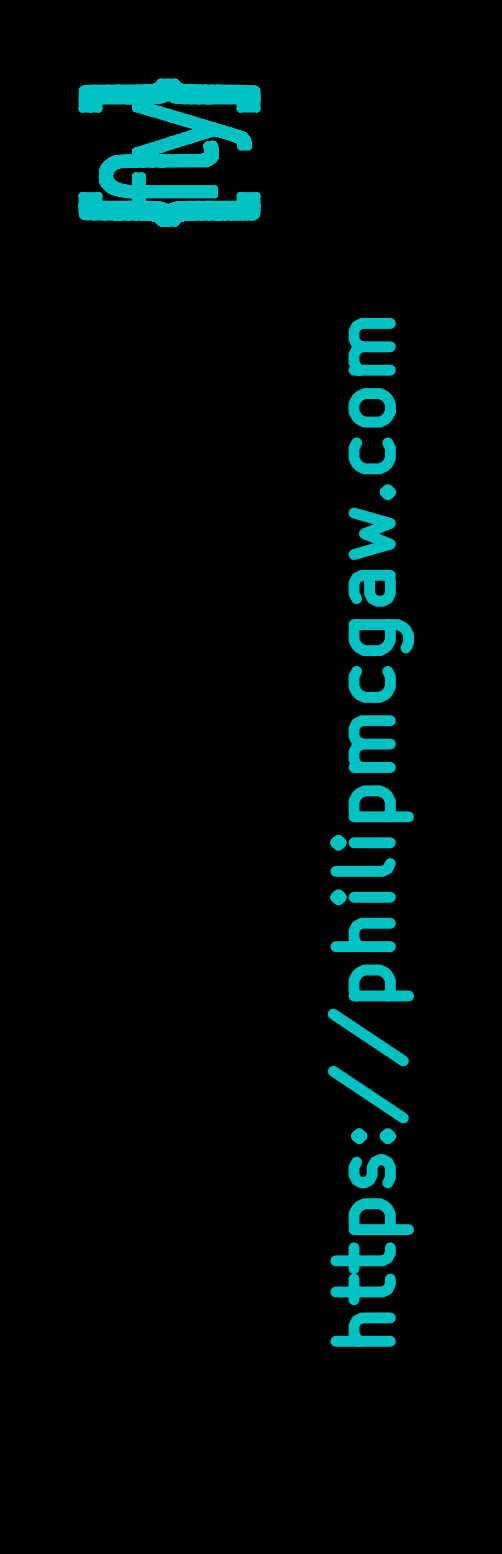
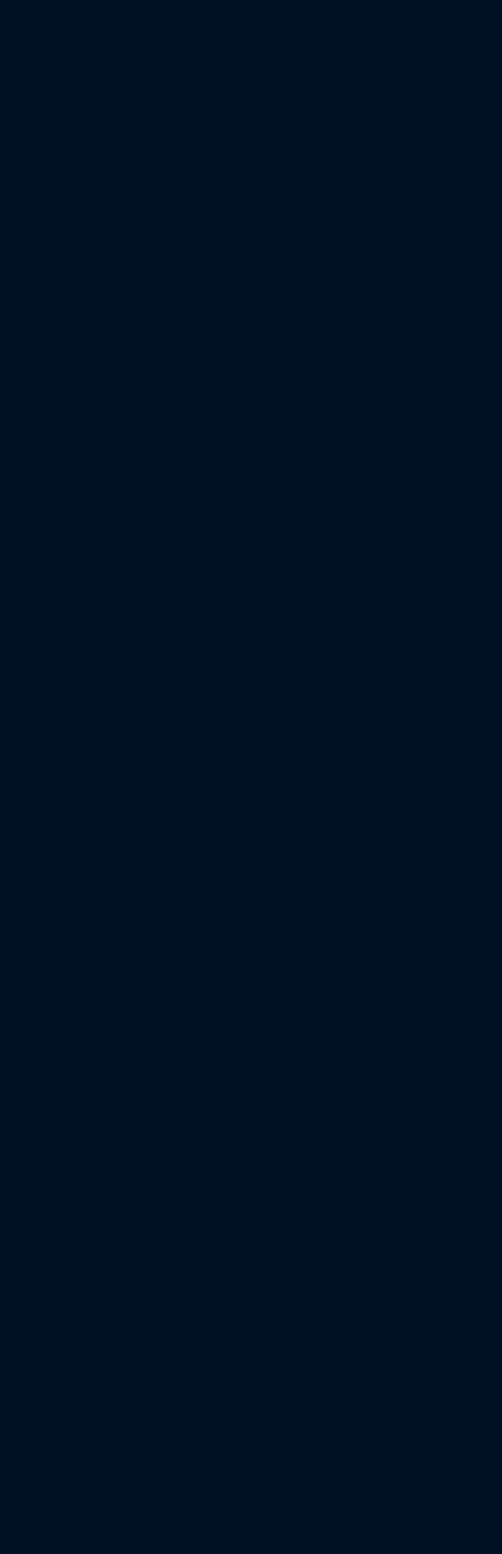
drawing: [78, 78, 261, 227] -> none
text: https://philipmcgaw.com (370, 832) -> none

